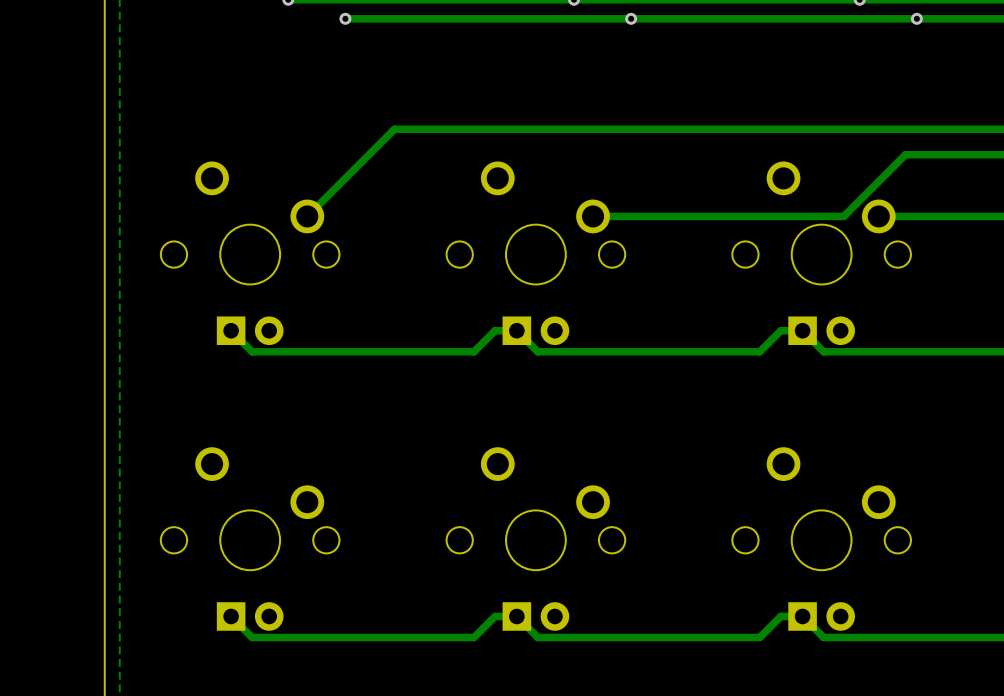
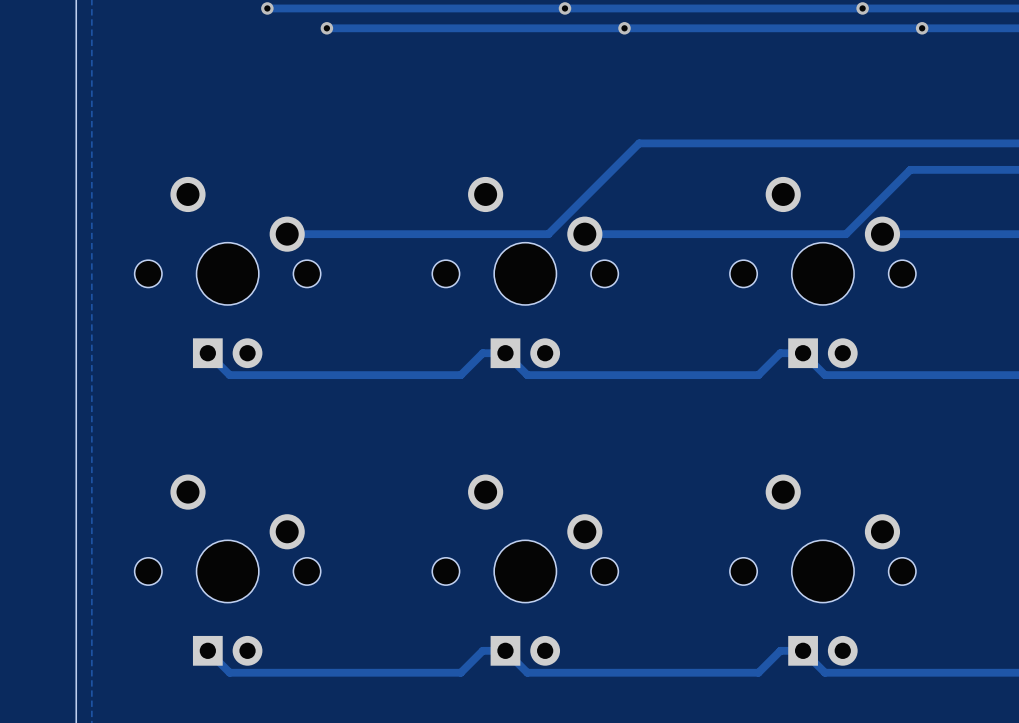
track: (645, 129) (394, 129) (307, 216) -> (639, 143) (548, 234) (287, 234)

